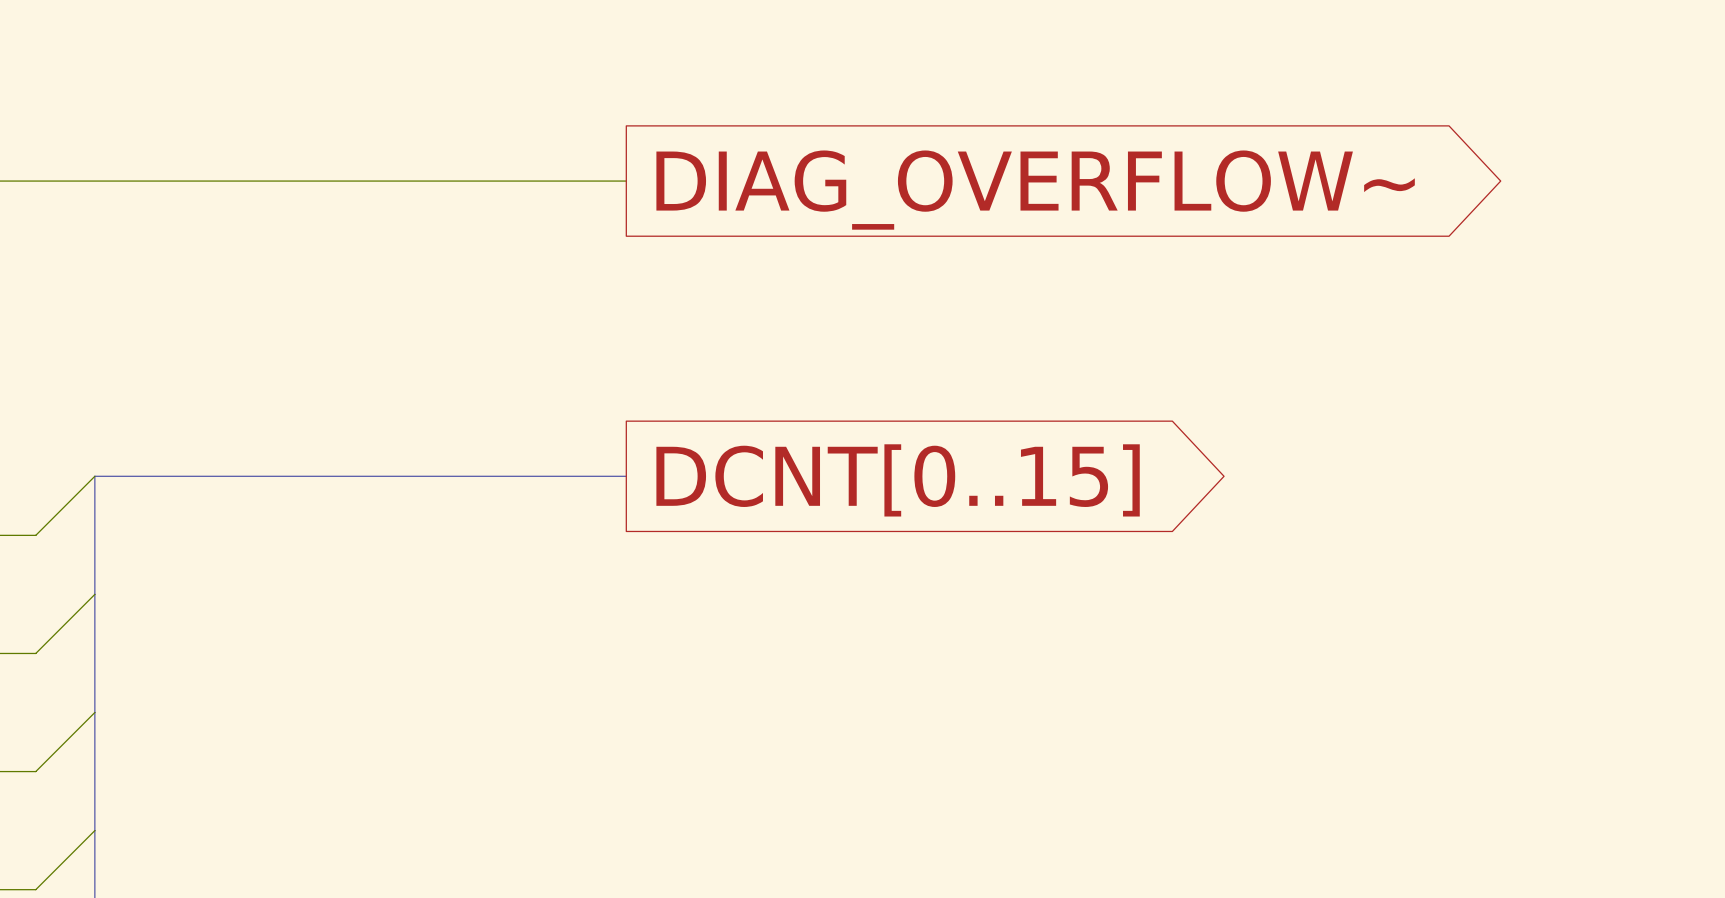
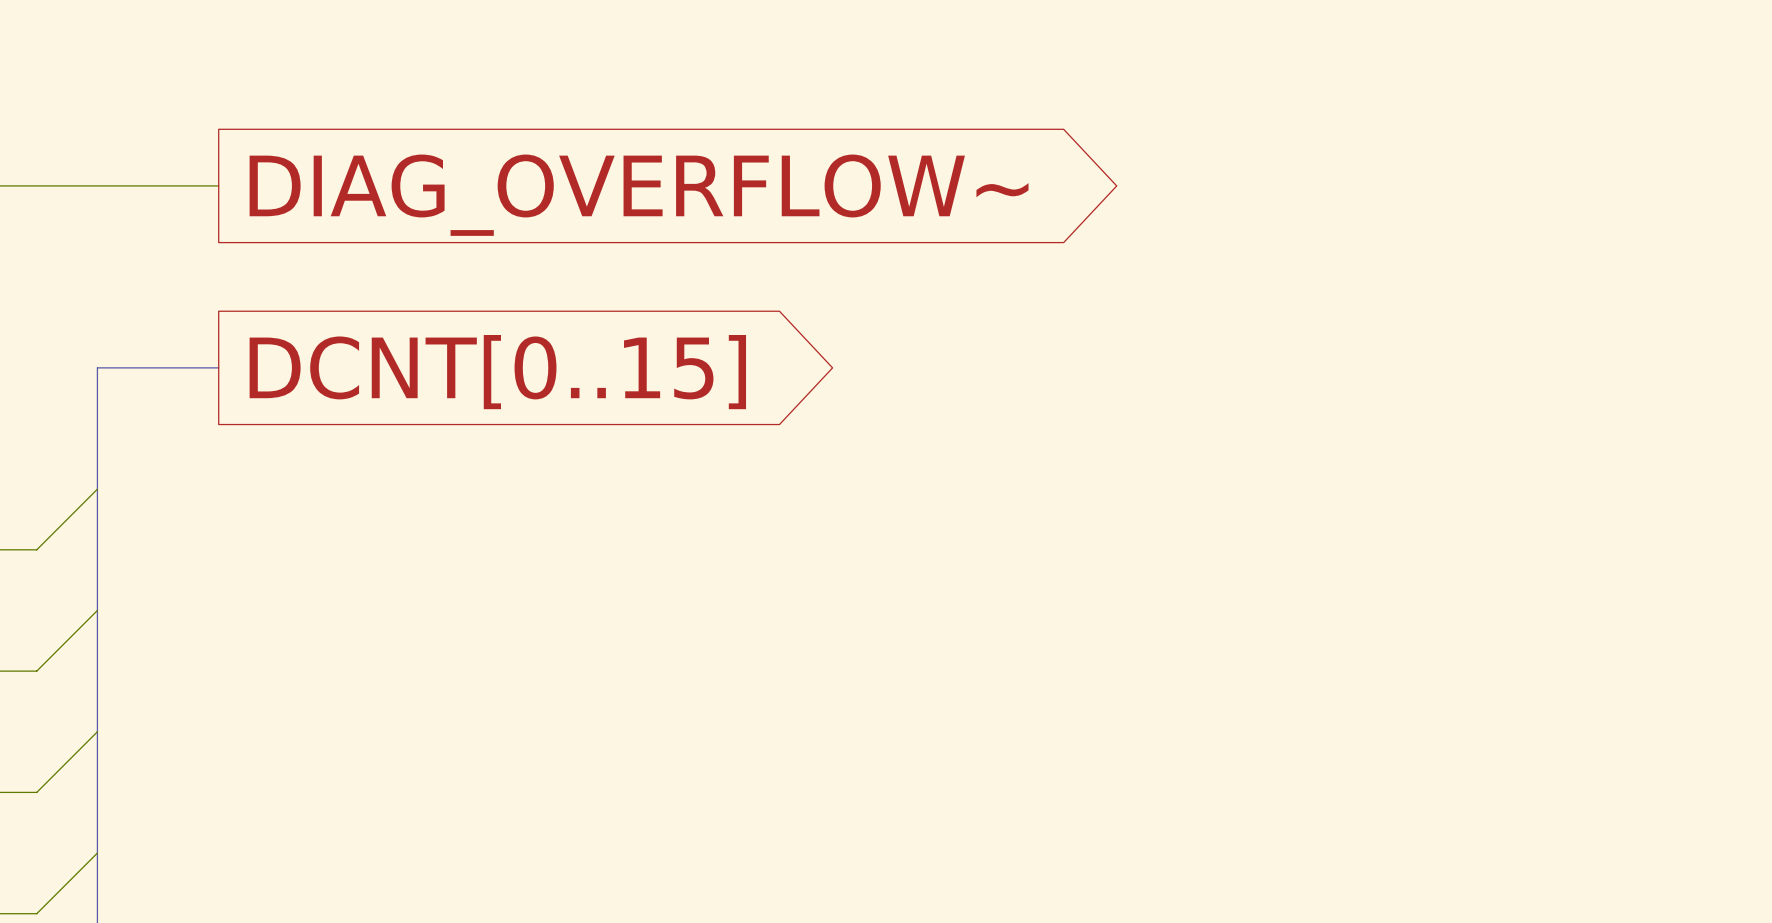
wire: (212, 181) (626, 181) -> none
global label position: DIAG_OVERFLOW~ (1035, 190) -> DIAG_OVERFLOW~ (639, 195)
bus: (94, 476) (626, 476) -> (97, 489) (97, 367) (218, 367)
global label position: DCNT[0..15] (898, 480) -> DCNT[0..15] (497, 372)

